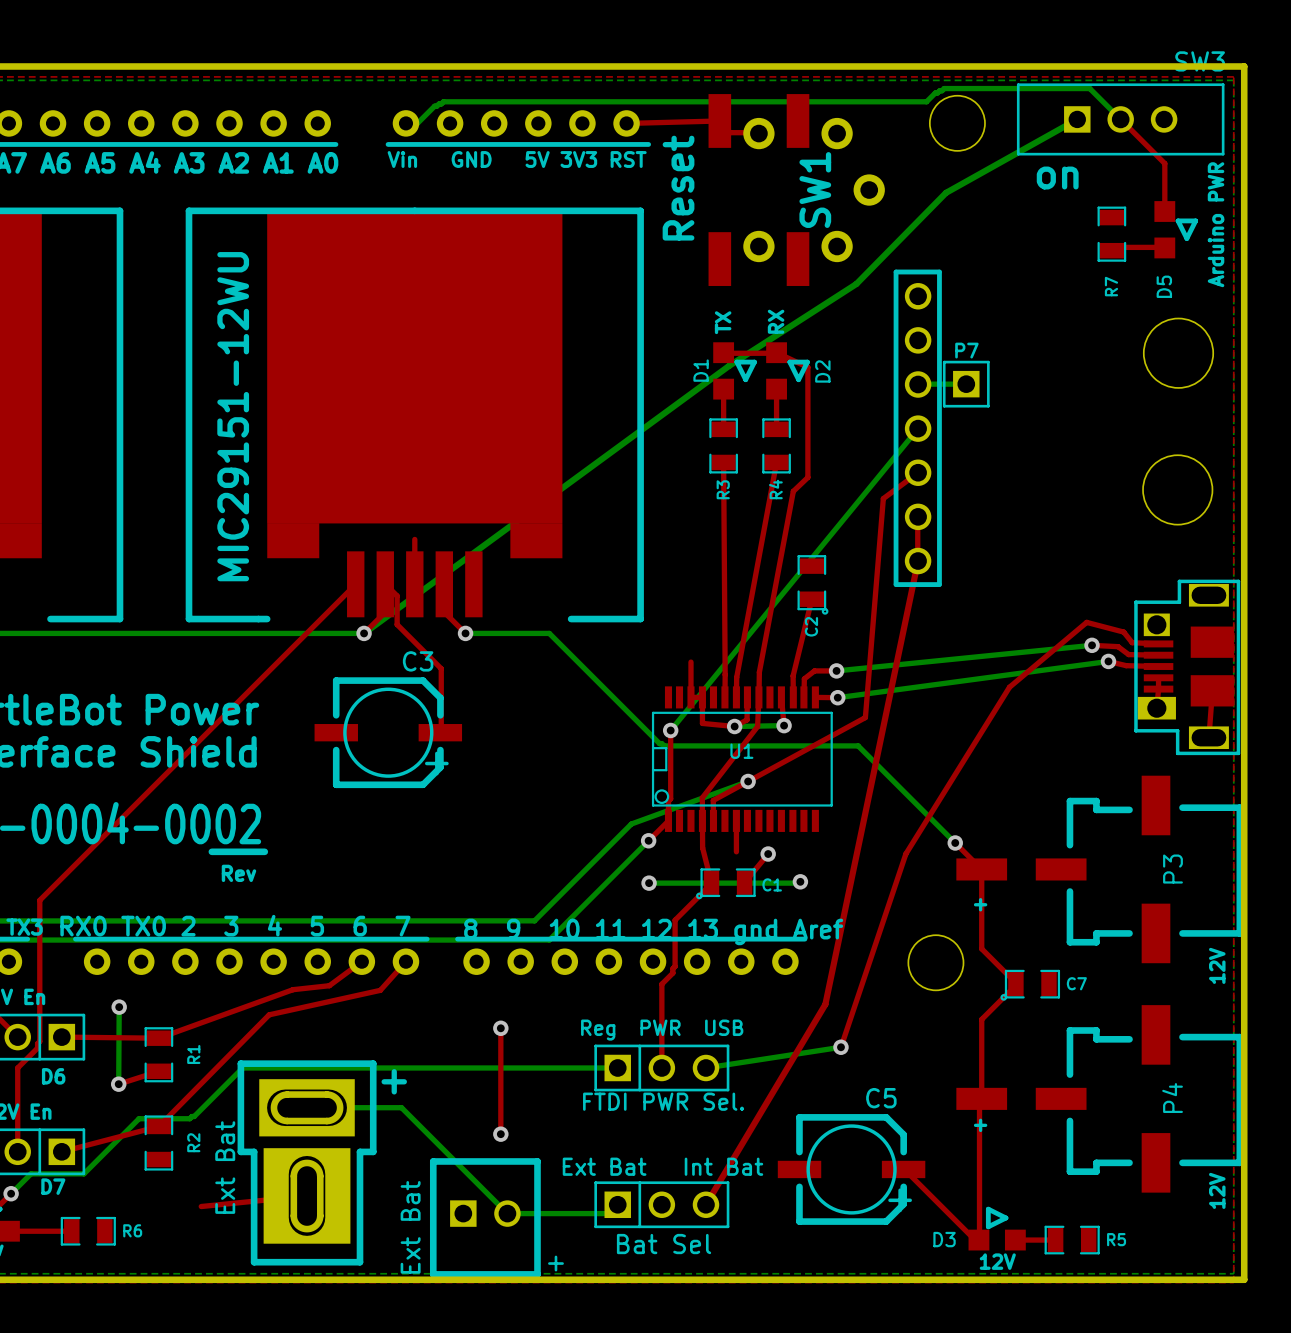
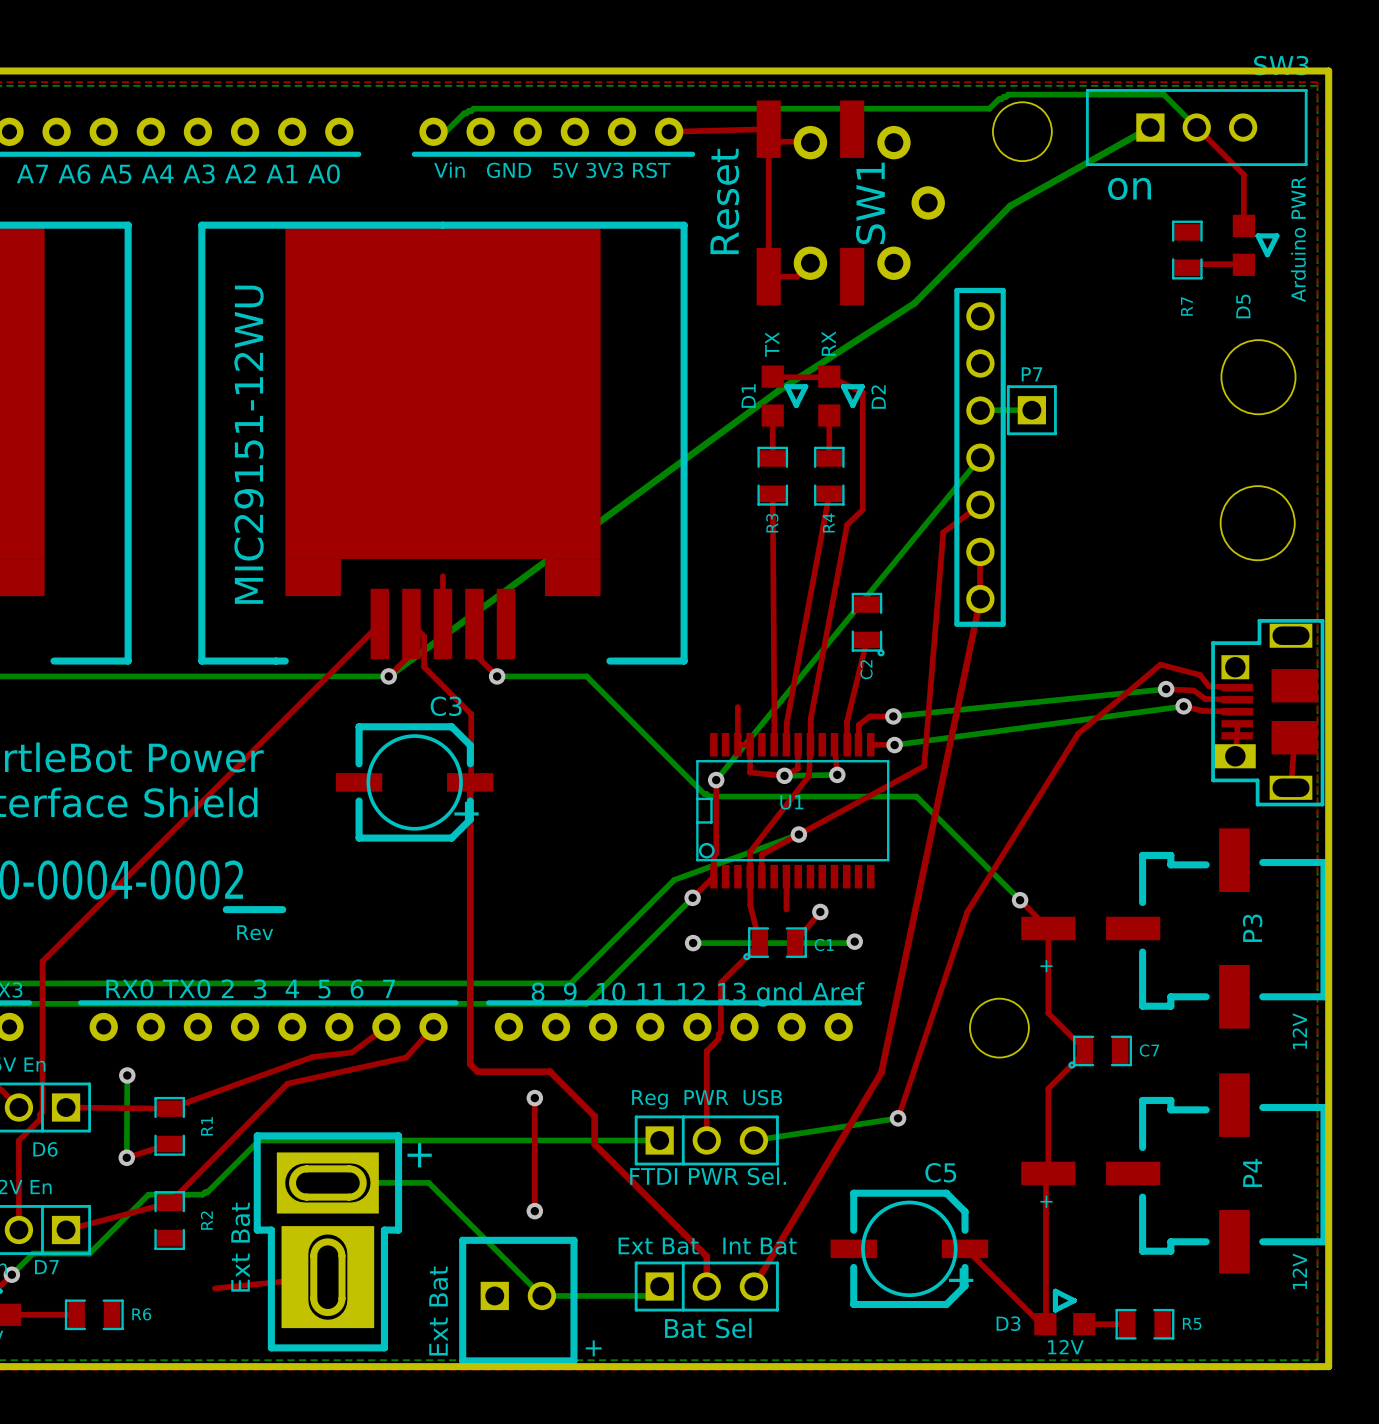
top track: none -> (768, 129) (768, 276) (797, 276) (810, 263)
top track: none -> (470, 782) (470, 1064) (477, 1071) (550, 1071) (594, 1116) (594, 1144) (706, 1256) (706, 1286)

